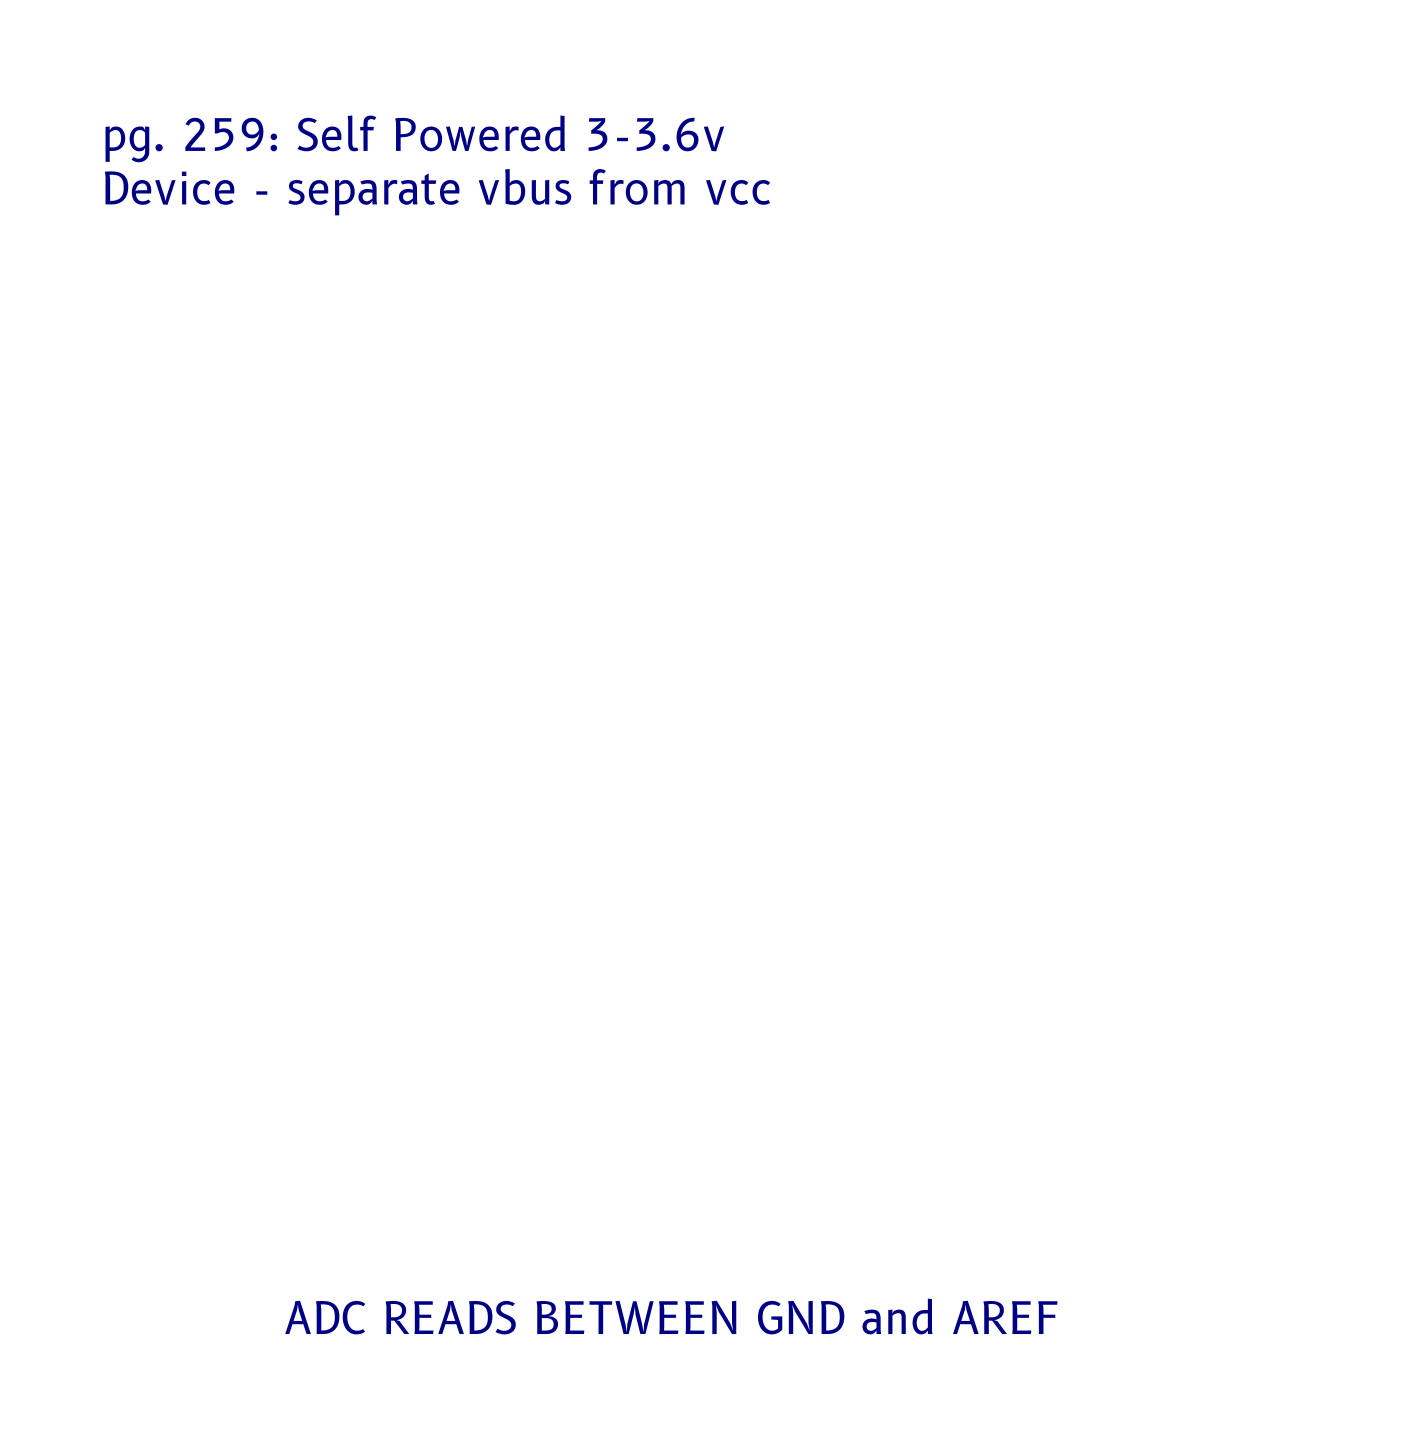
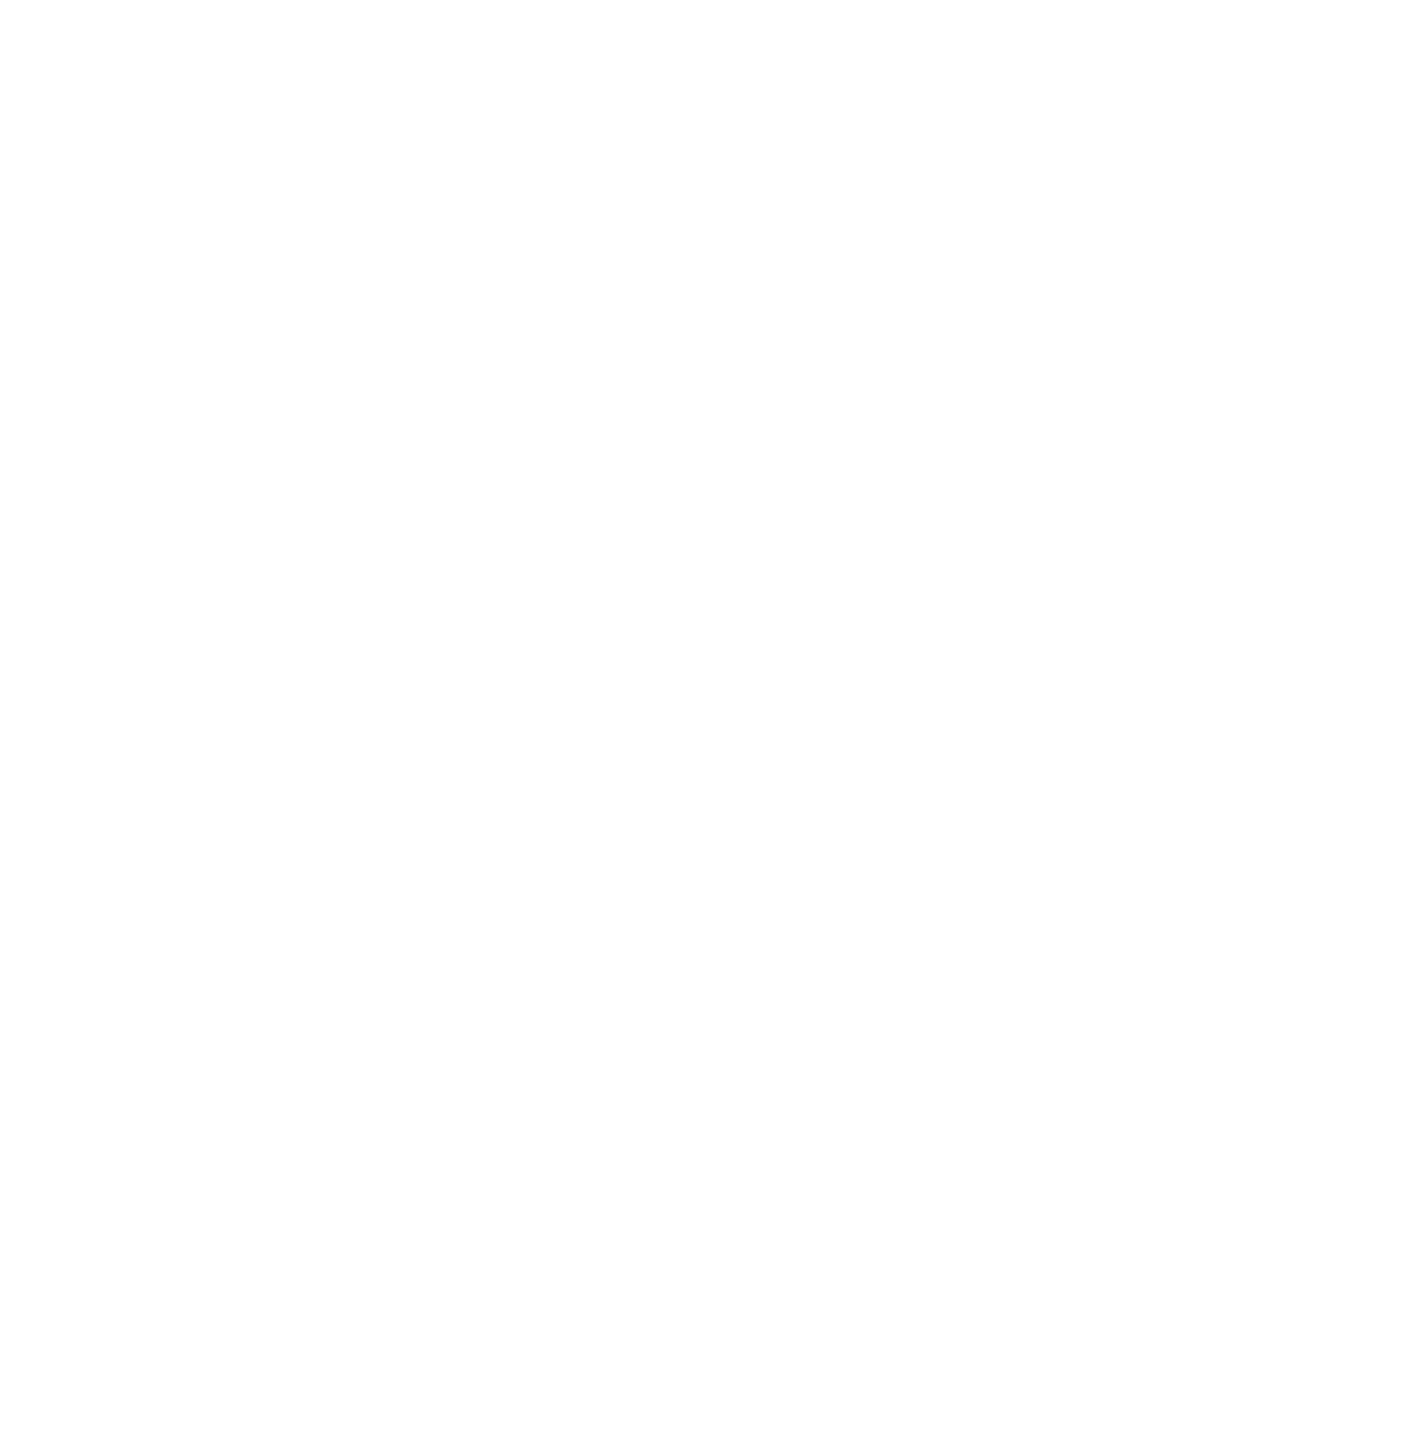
text: pg. 259: Self Powered 3-3.6v (414, 138) -> none
text: Device - separate vbus from vcc (437, 192) -> none
text: ADC READS BETWEEN GND and AREF (671, 1316) -> none

